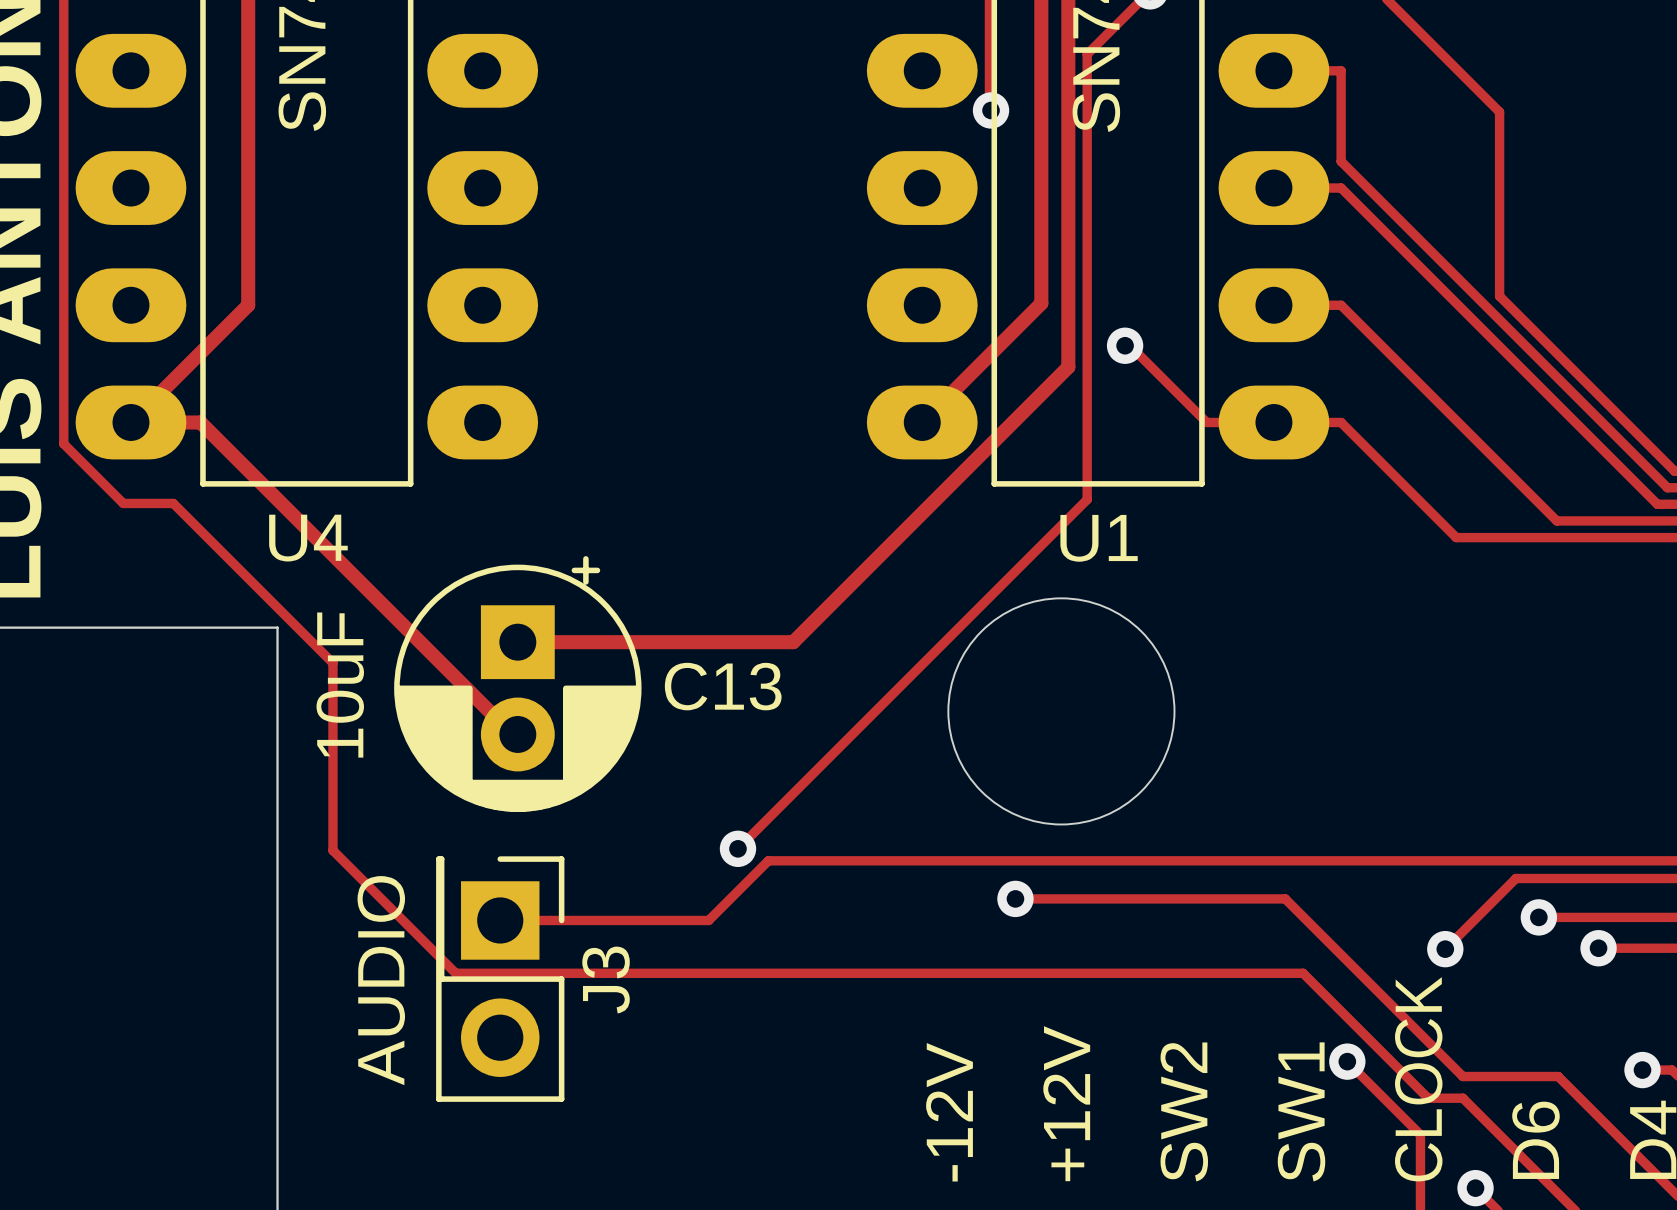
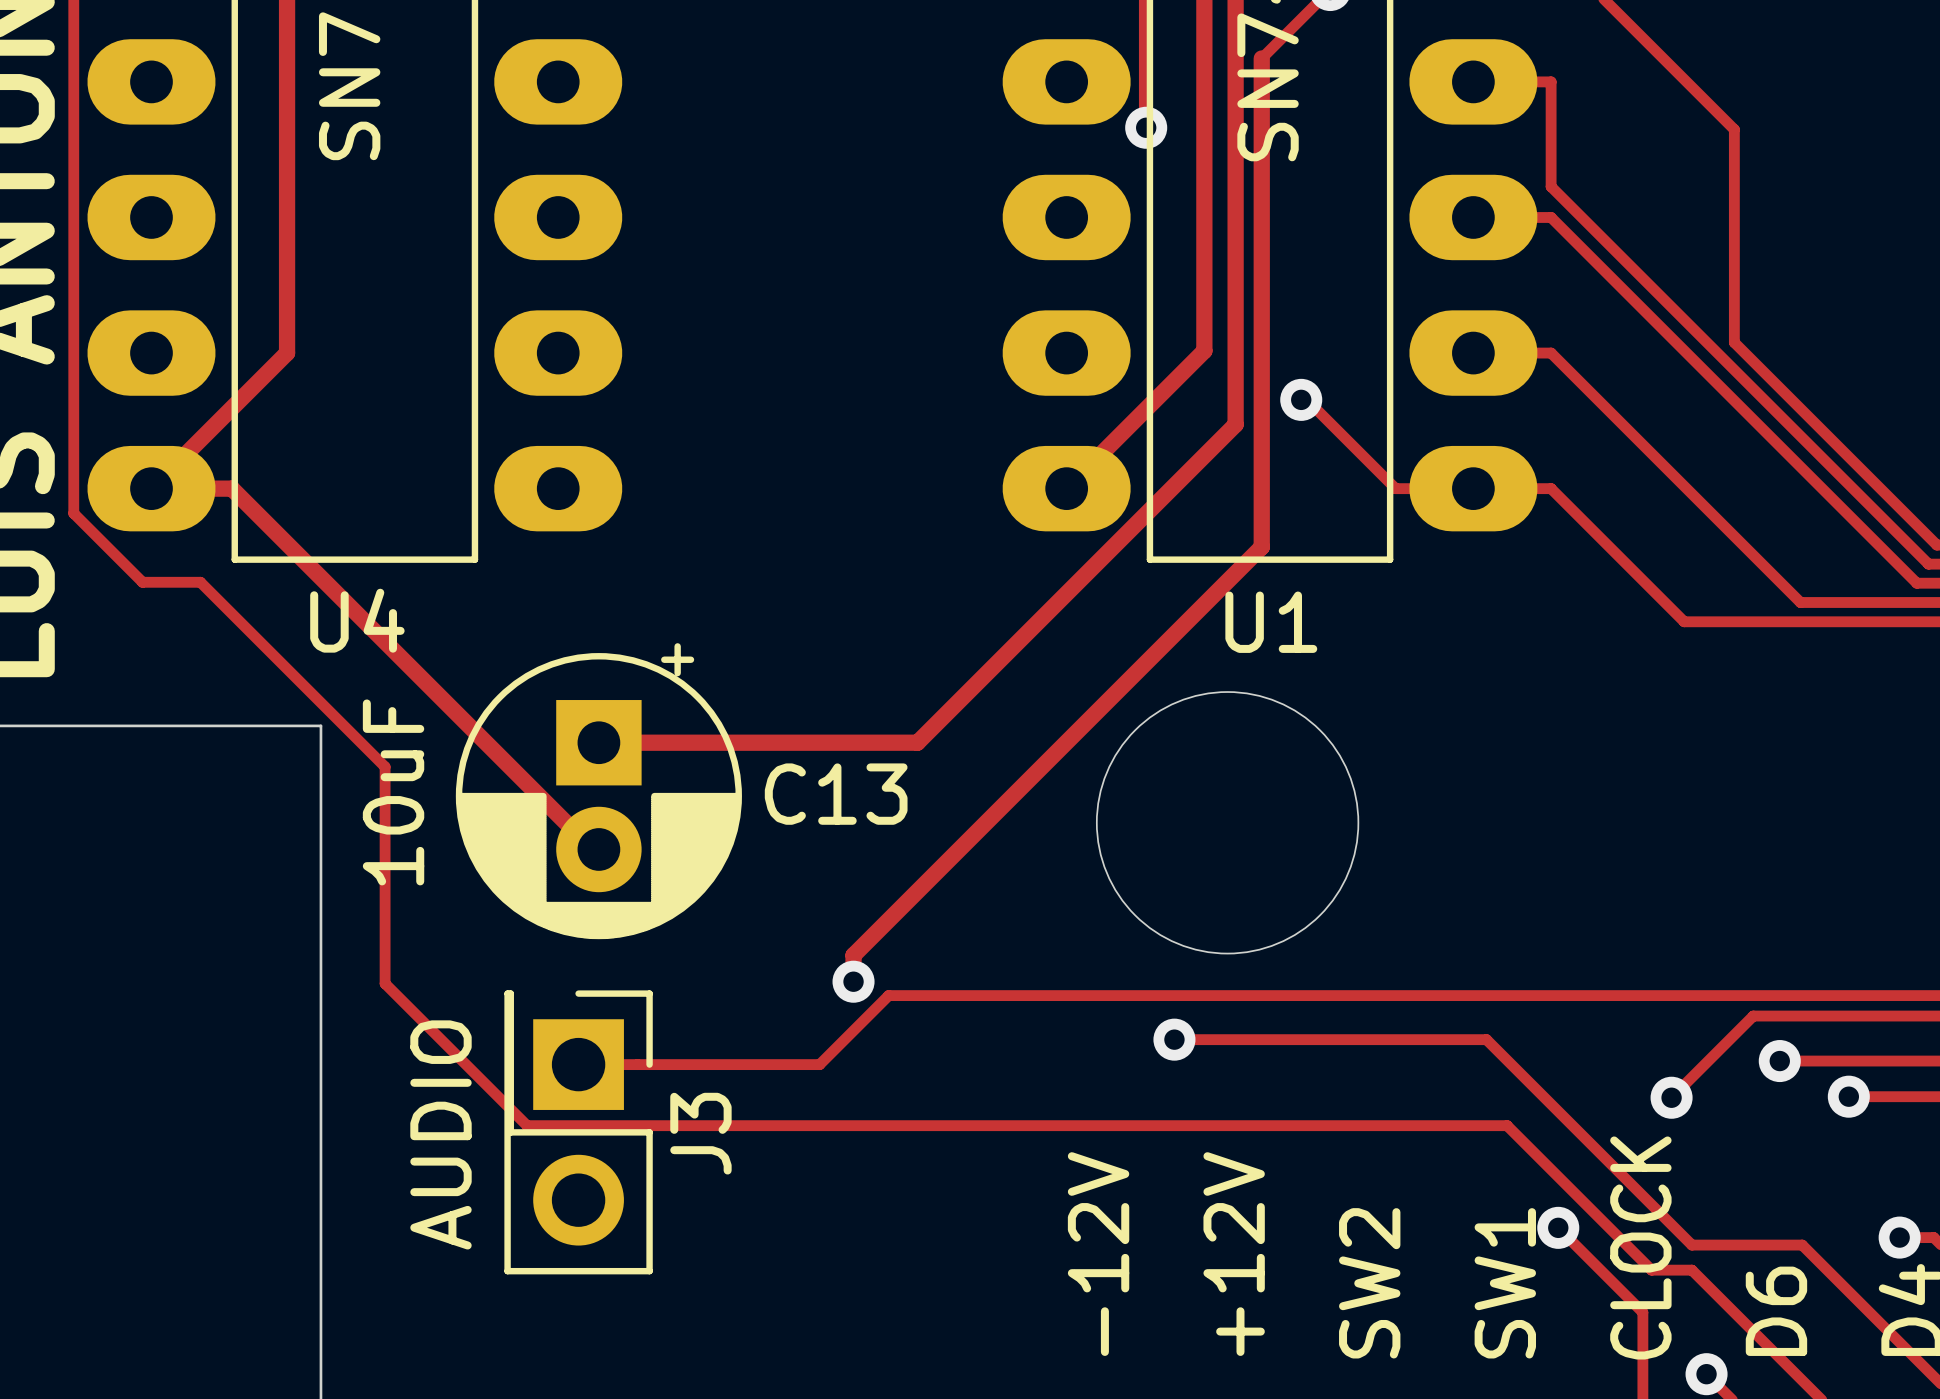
track: (1090, 50) (1087, 54) (1087, 499) (737, 848) -> (1261, 58) (1261, 547) (853, 955) (853, 981)

